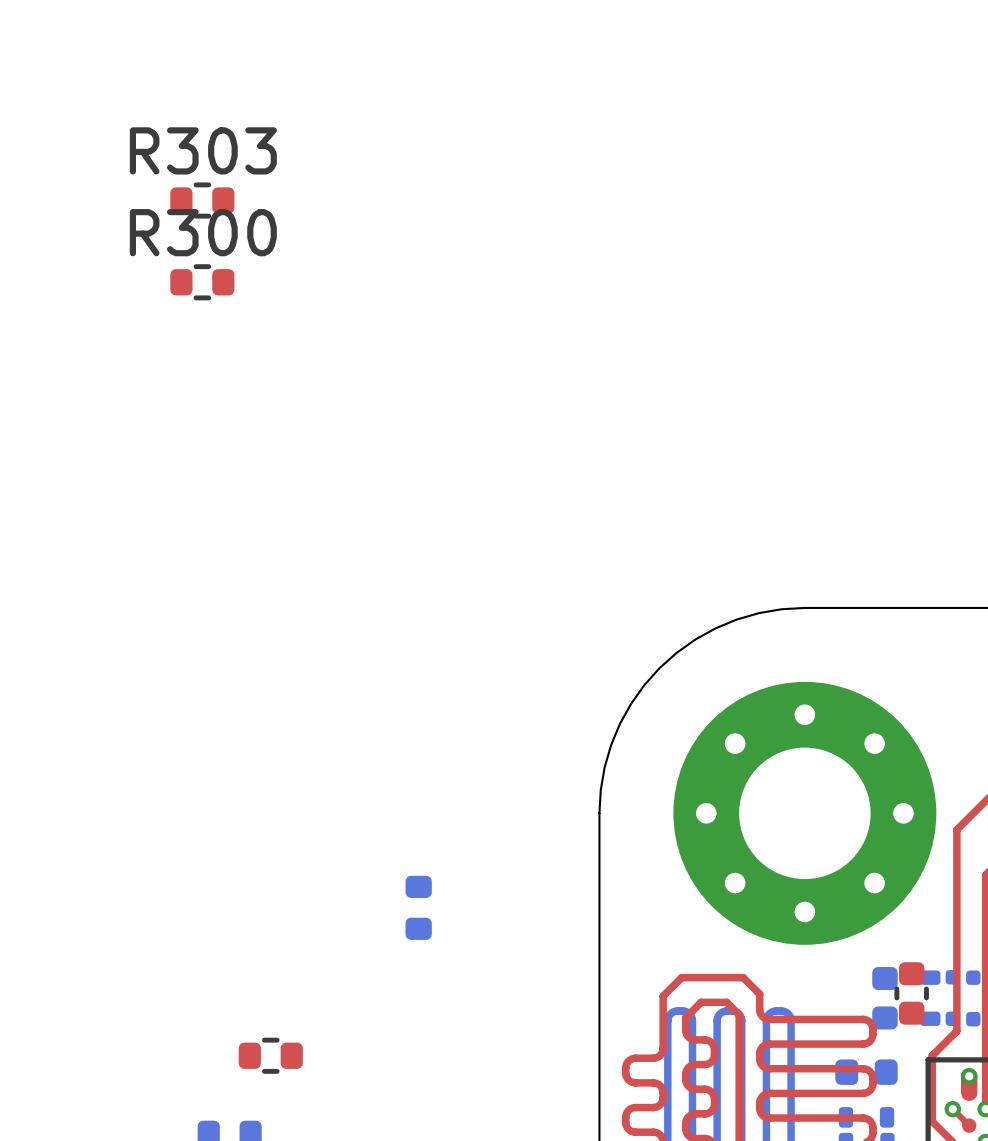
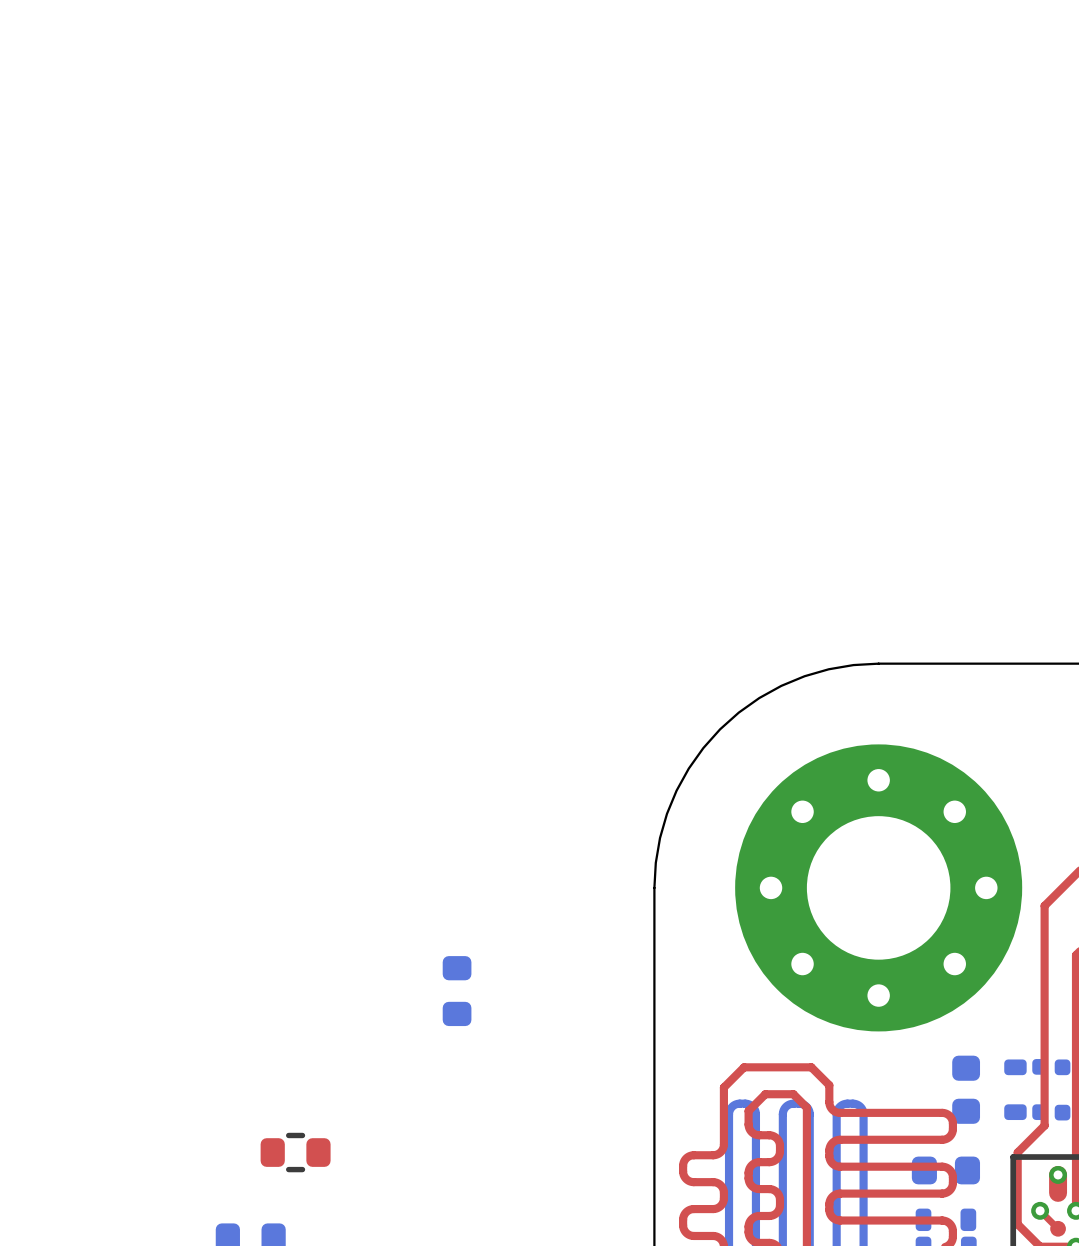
R303: (202, 200) -> none
R300: (202, 282) -> none
part: (911, 993) -> none

